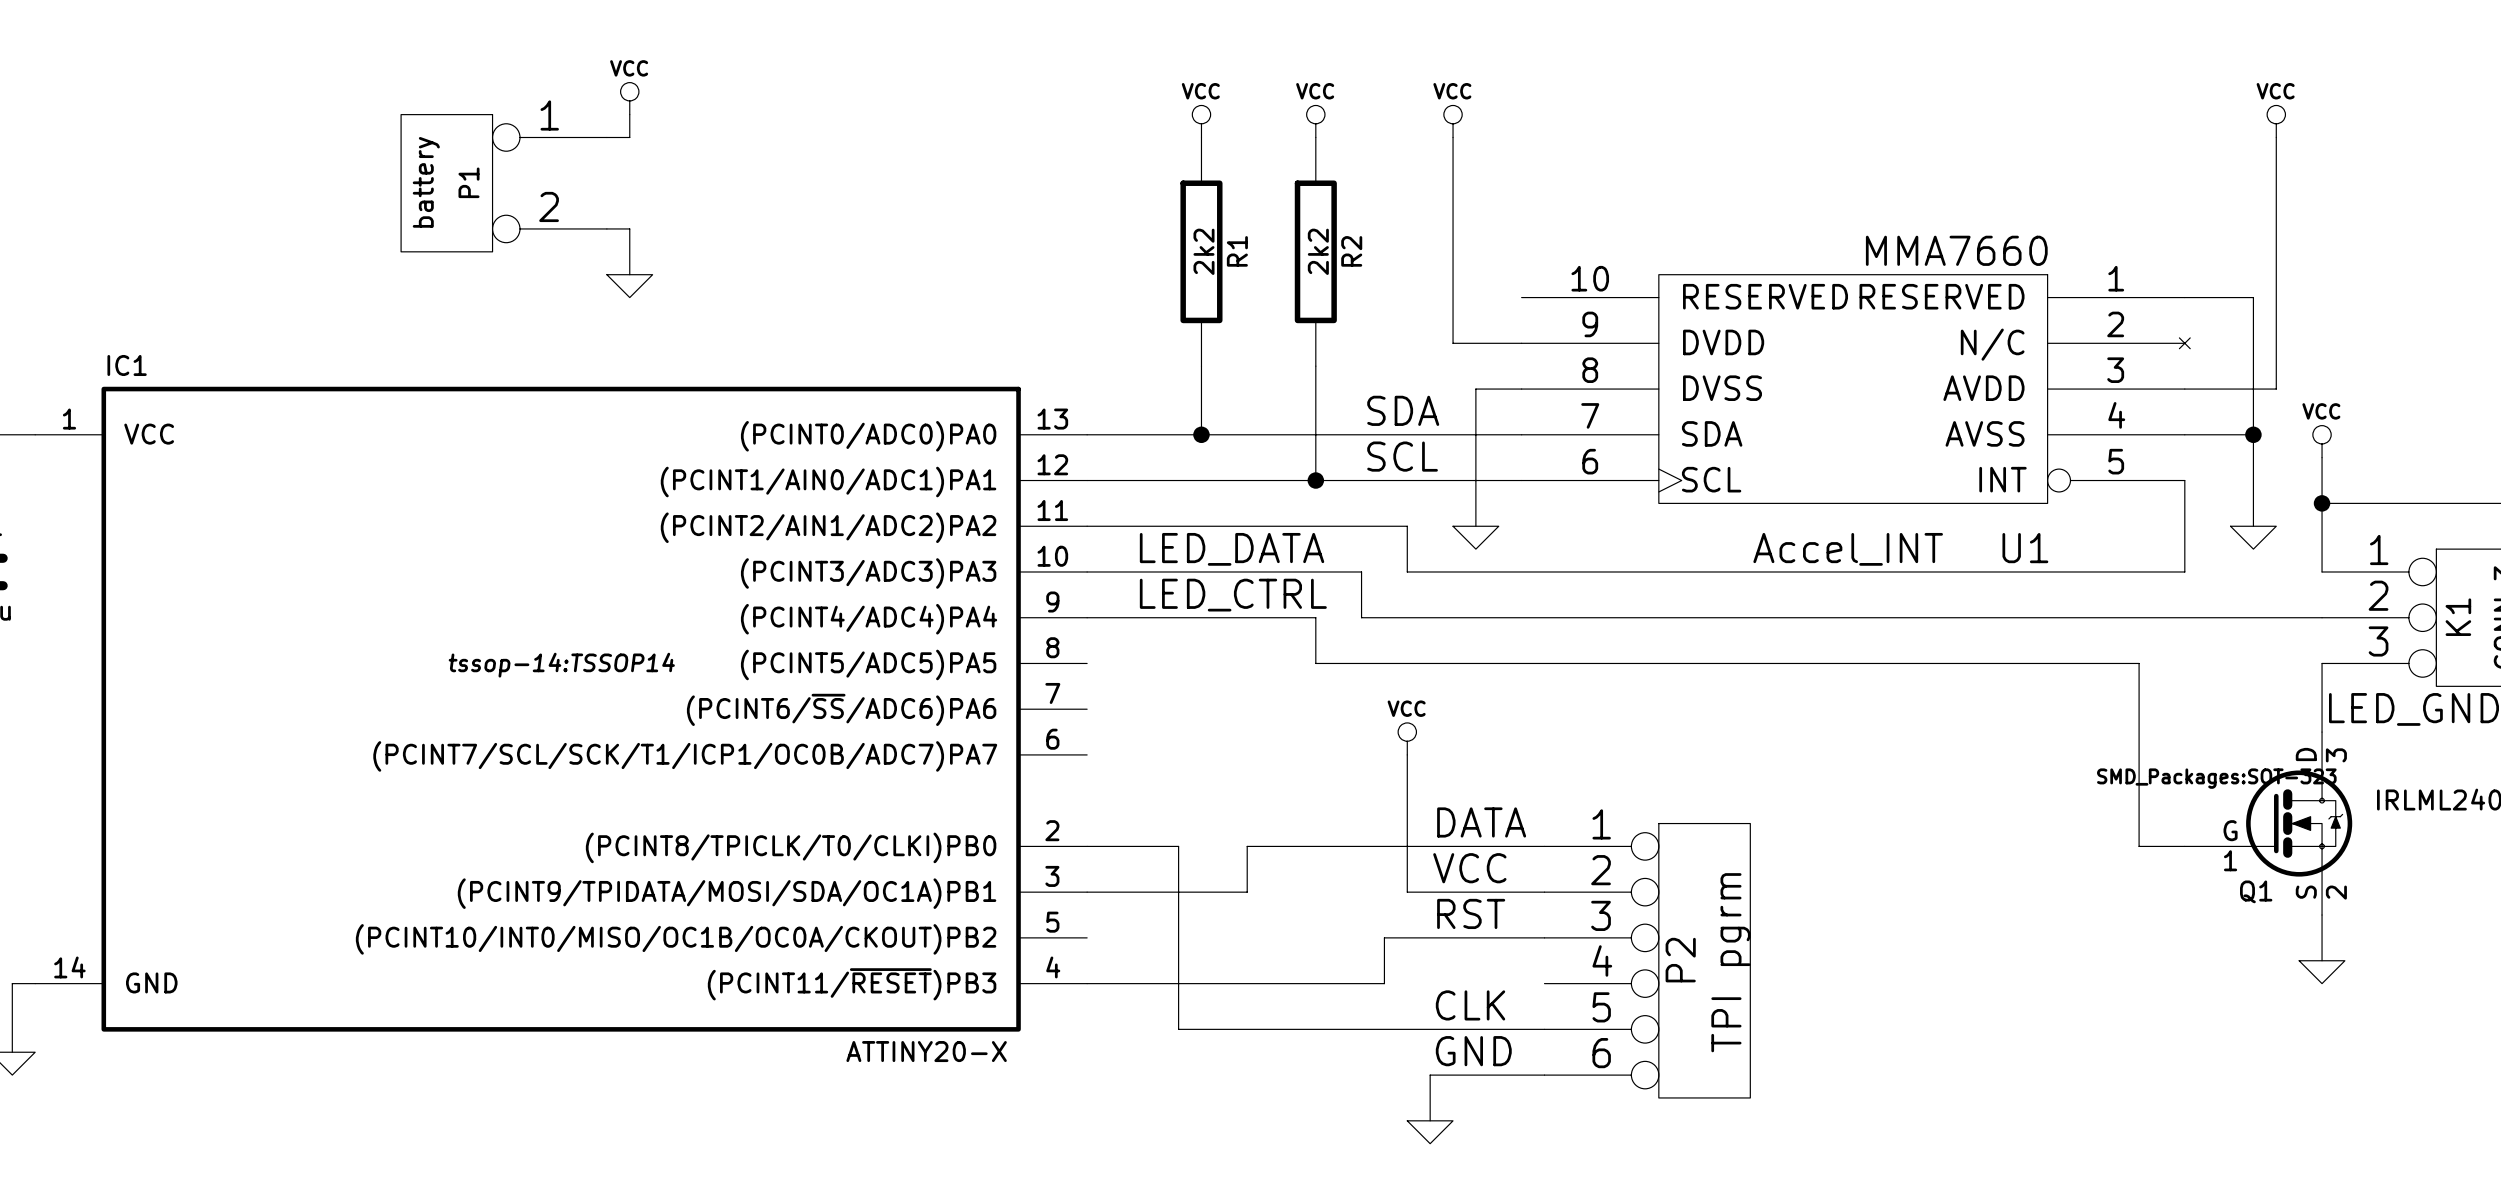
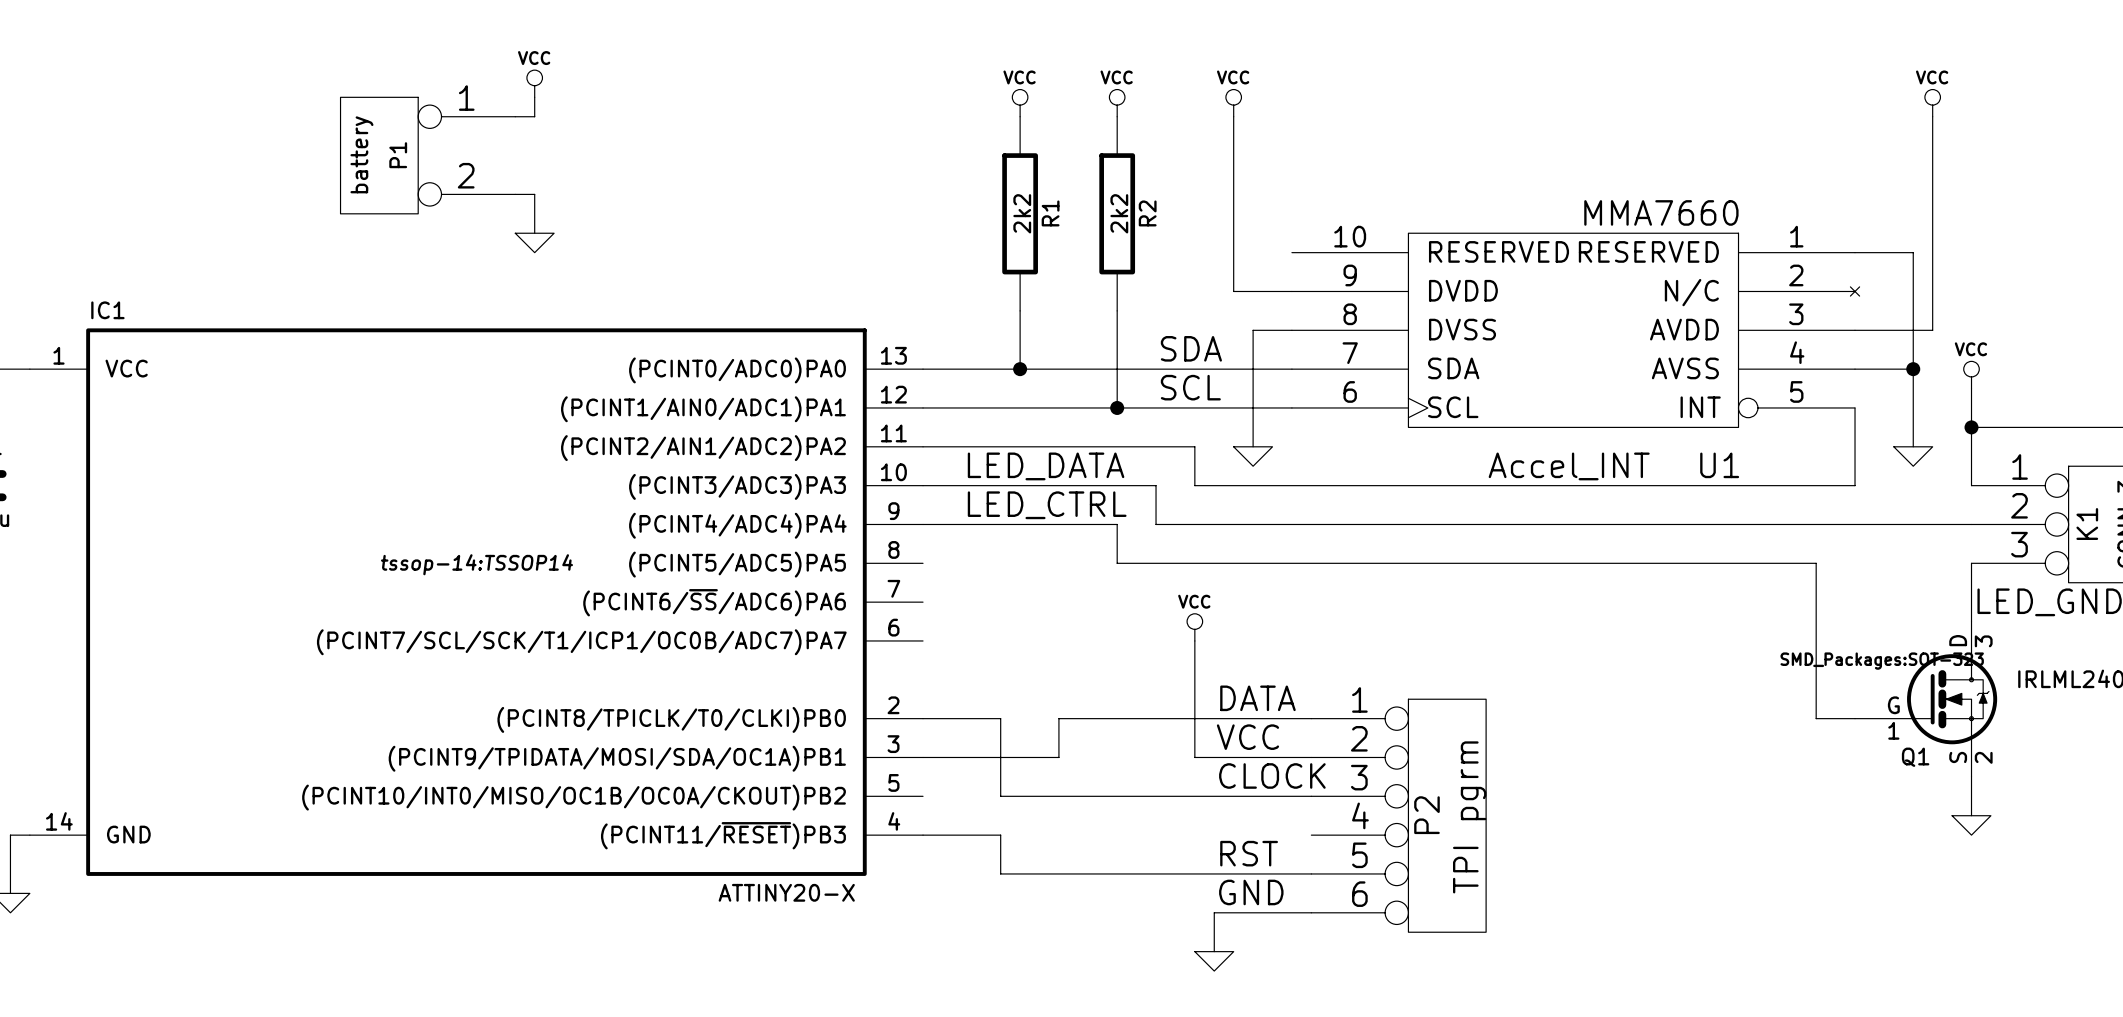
label: RST (1471, 913) -> CLOCK (1272, 775)
wire: (1178, 937) (1178, 983) (1384, 983) (1384, 937) -> (1000, 796) (1175, 796)
label: CLK (1470, 1005) -> RST (1249, 853)

